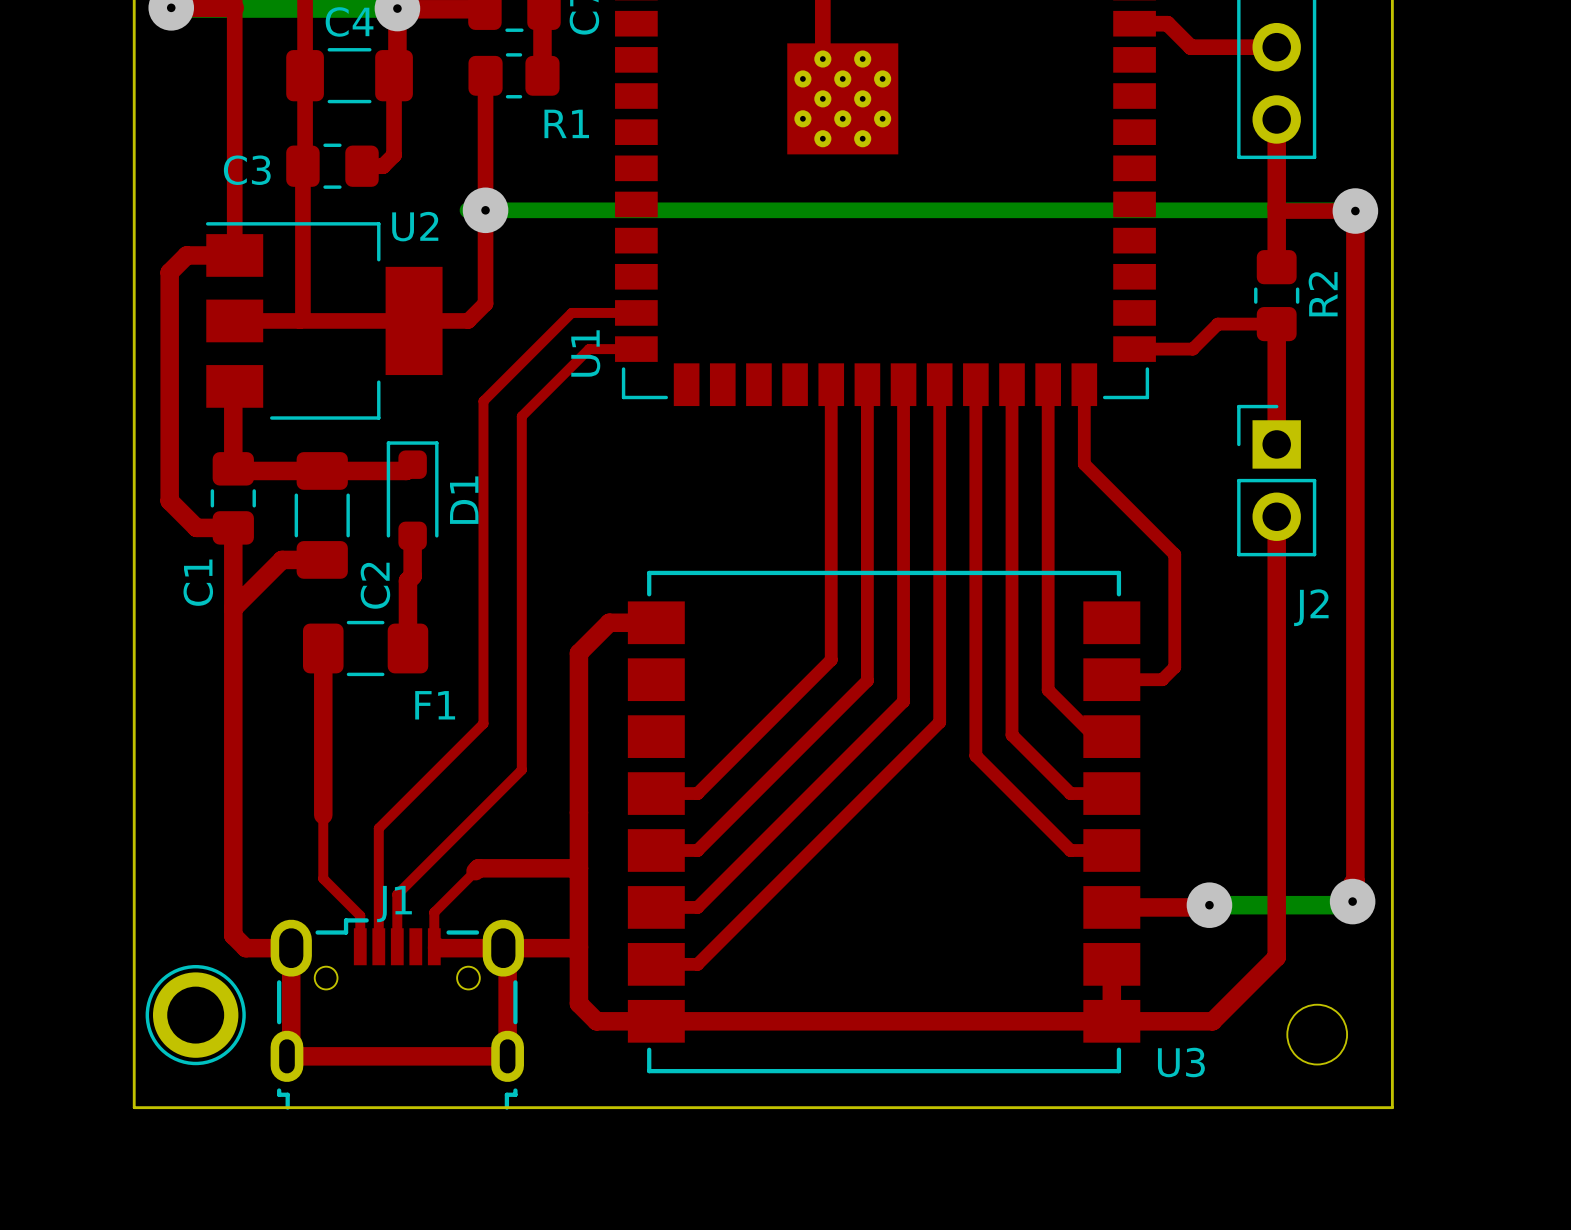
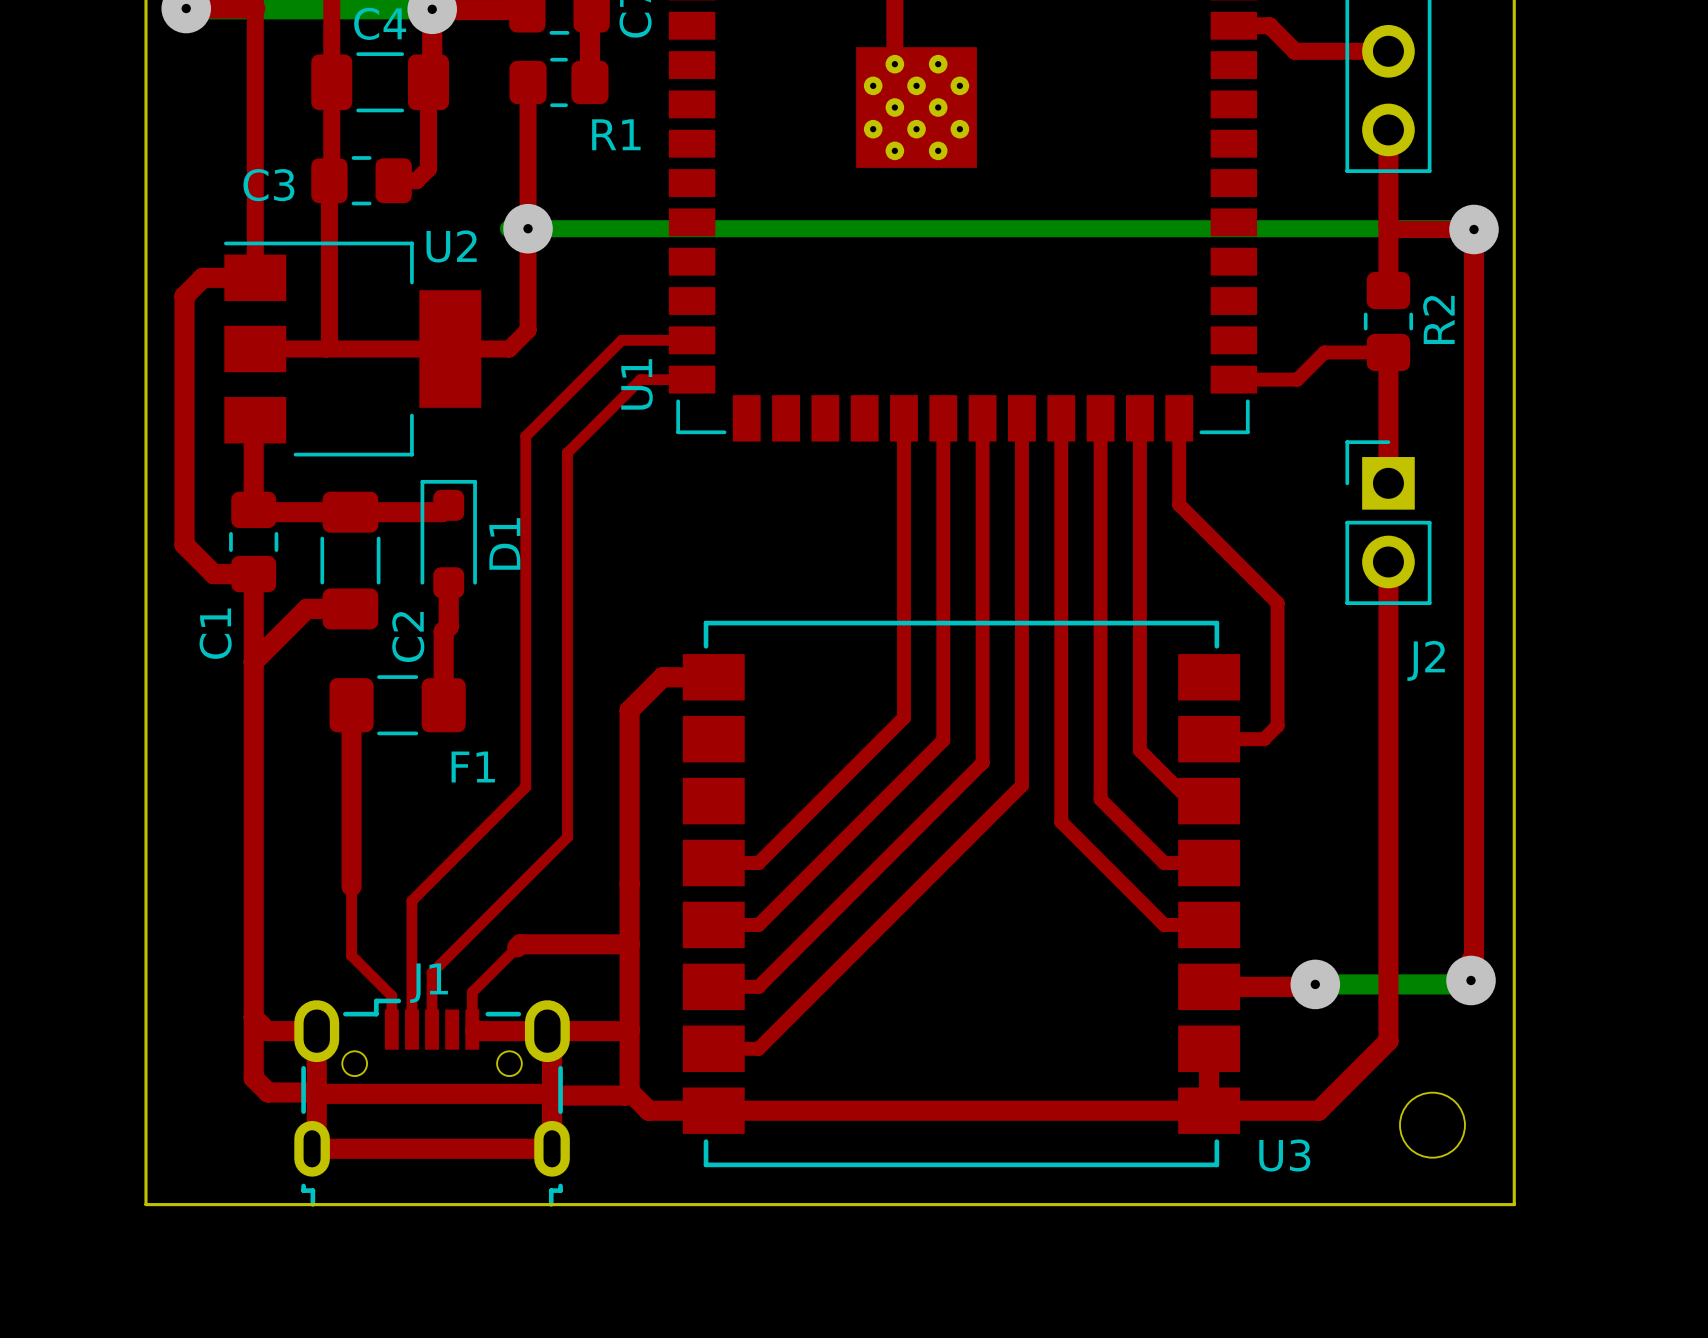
top track: none -> (253, 1017) (253, 1078) (268, 1092) (625, 1095) (629, 1091)
part: (195, 1015) -> none

